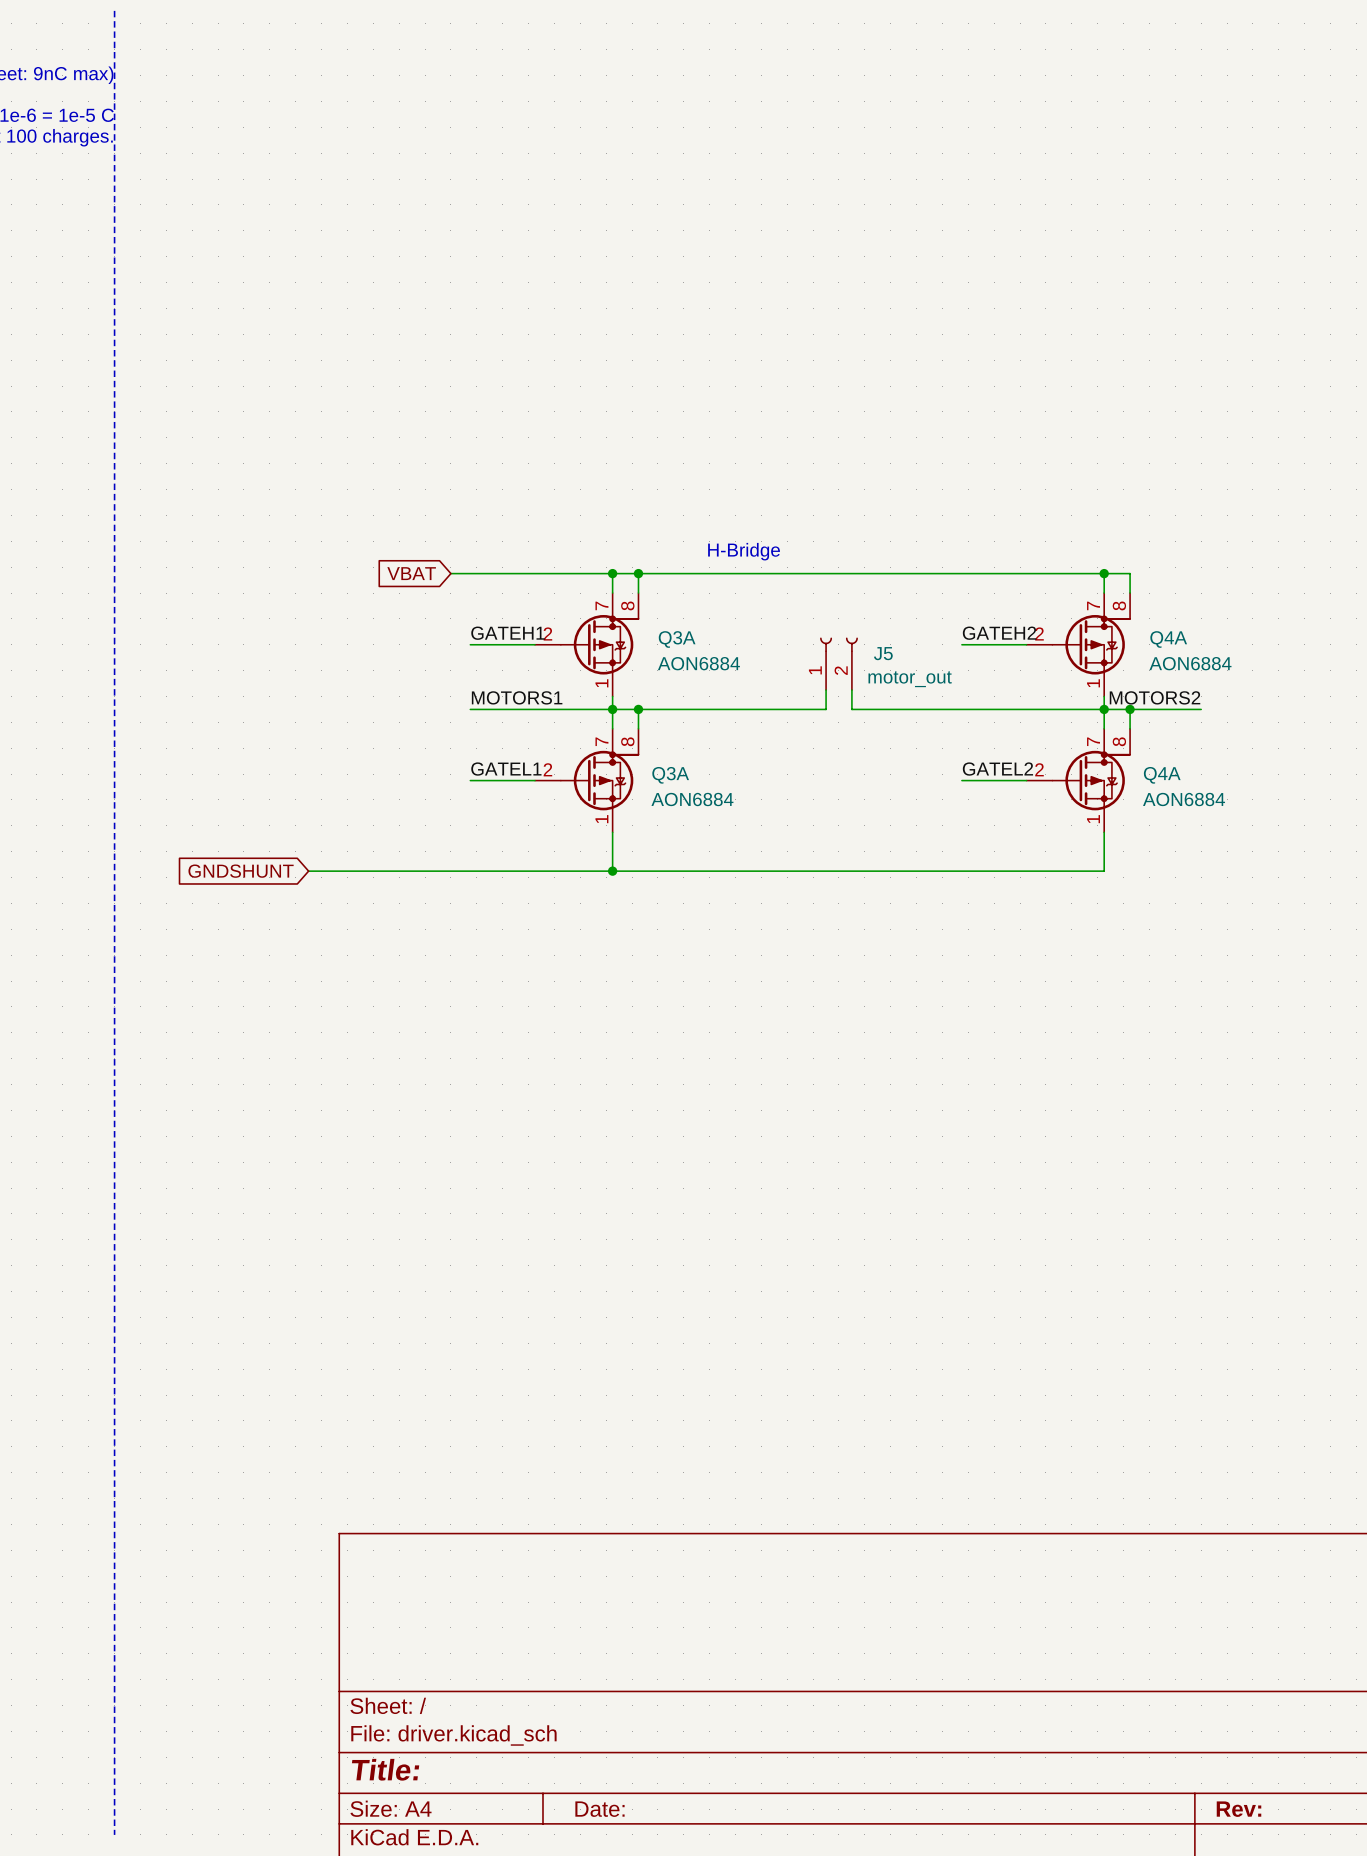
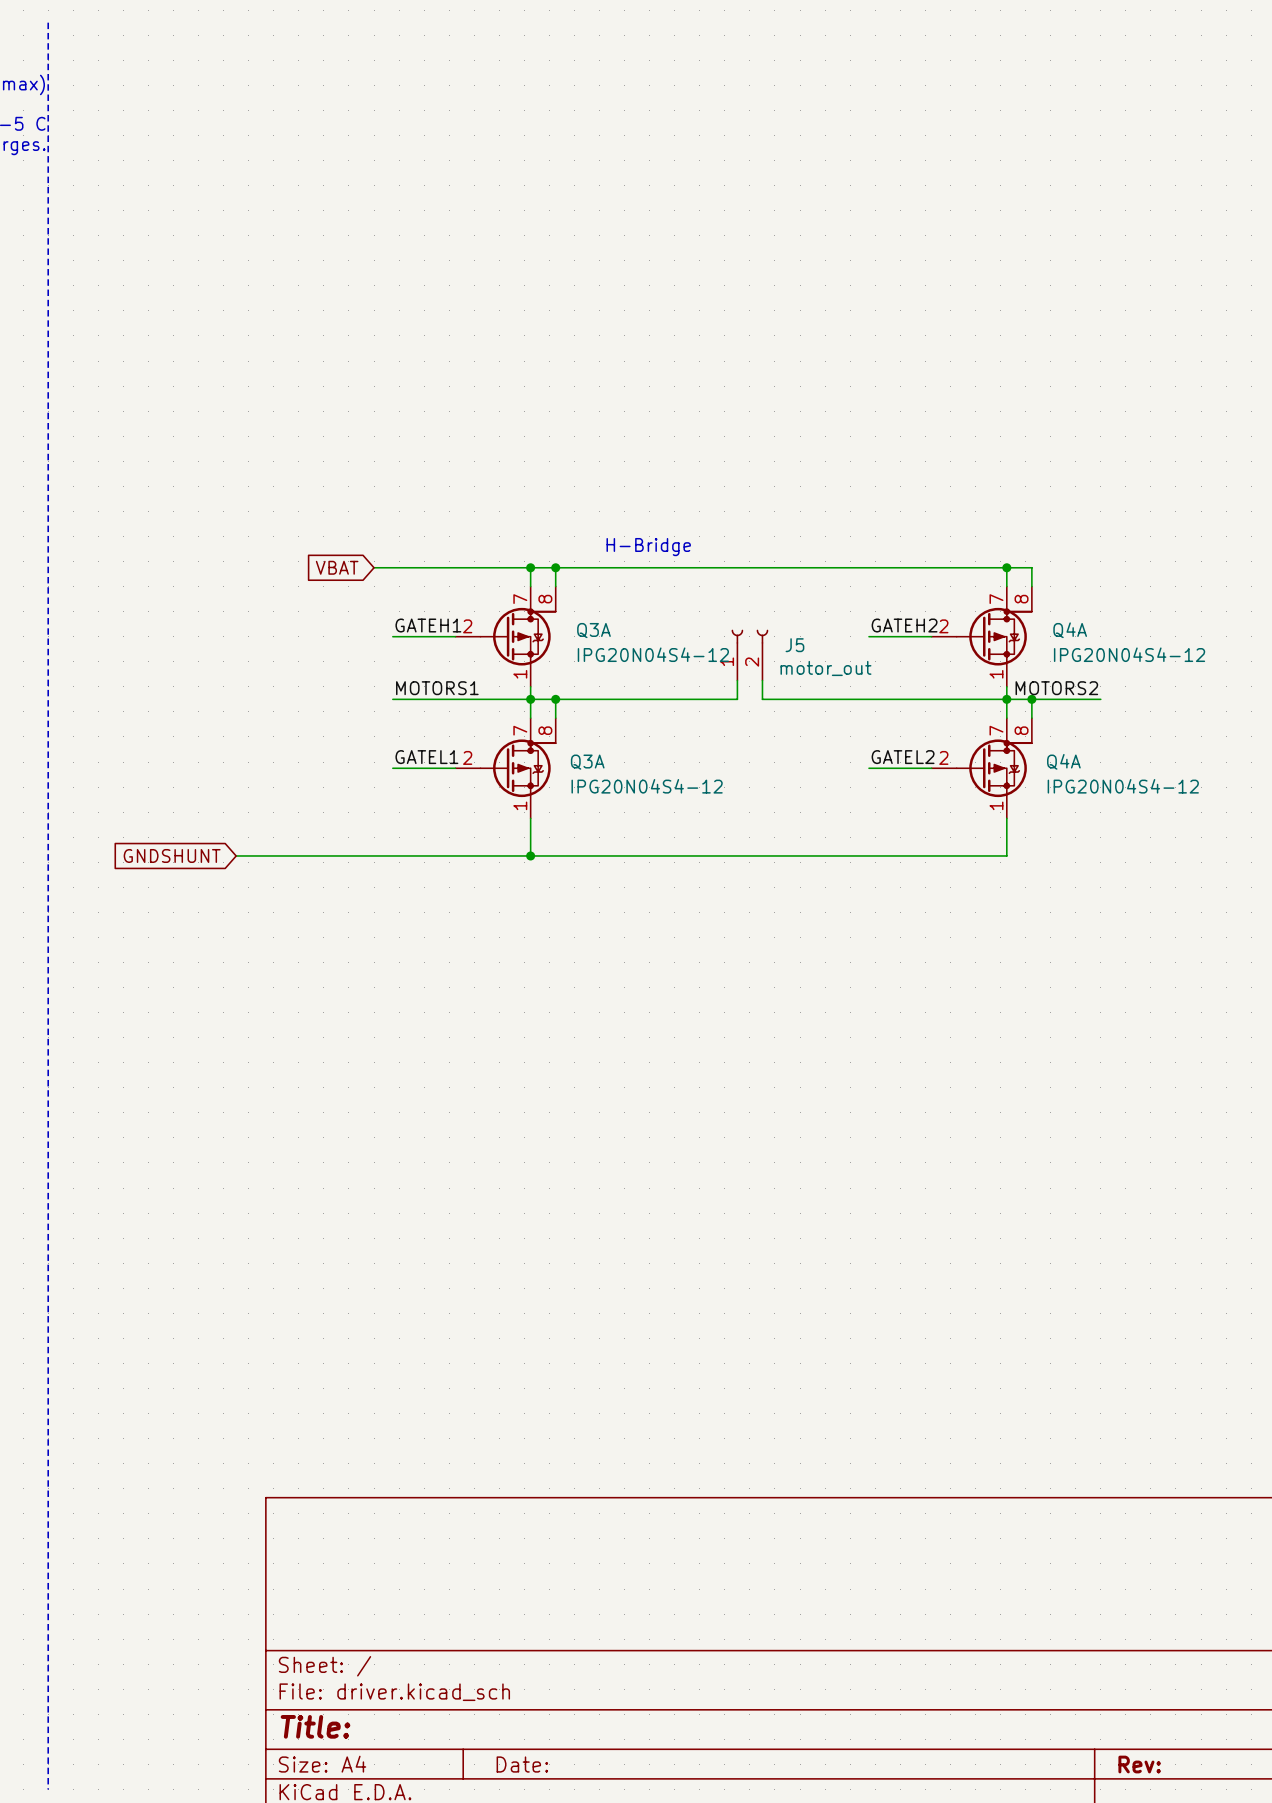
Q3A value: AON6884 (698, 663) -> IPG20N04S4-12 (653, 654)
Q4A value: AON6884 (1190, 663) -> IPG20N04S4-12 (1129, 654)
Q3A value: AON6884 (692, 799) -> IPG20N04S4-12 (647, 786)
Q4A value: AON6884 (1184, 799) -> IPG20N04S4-12 (1123, 786)

